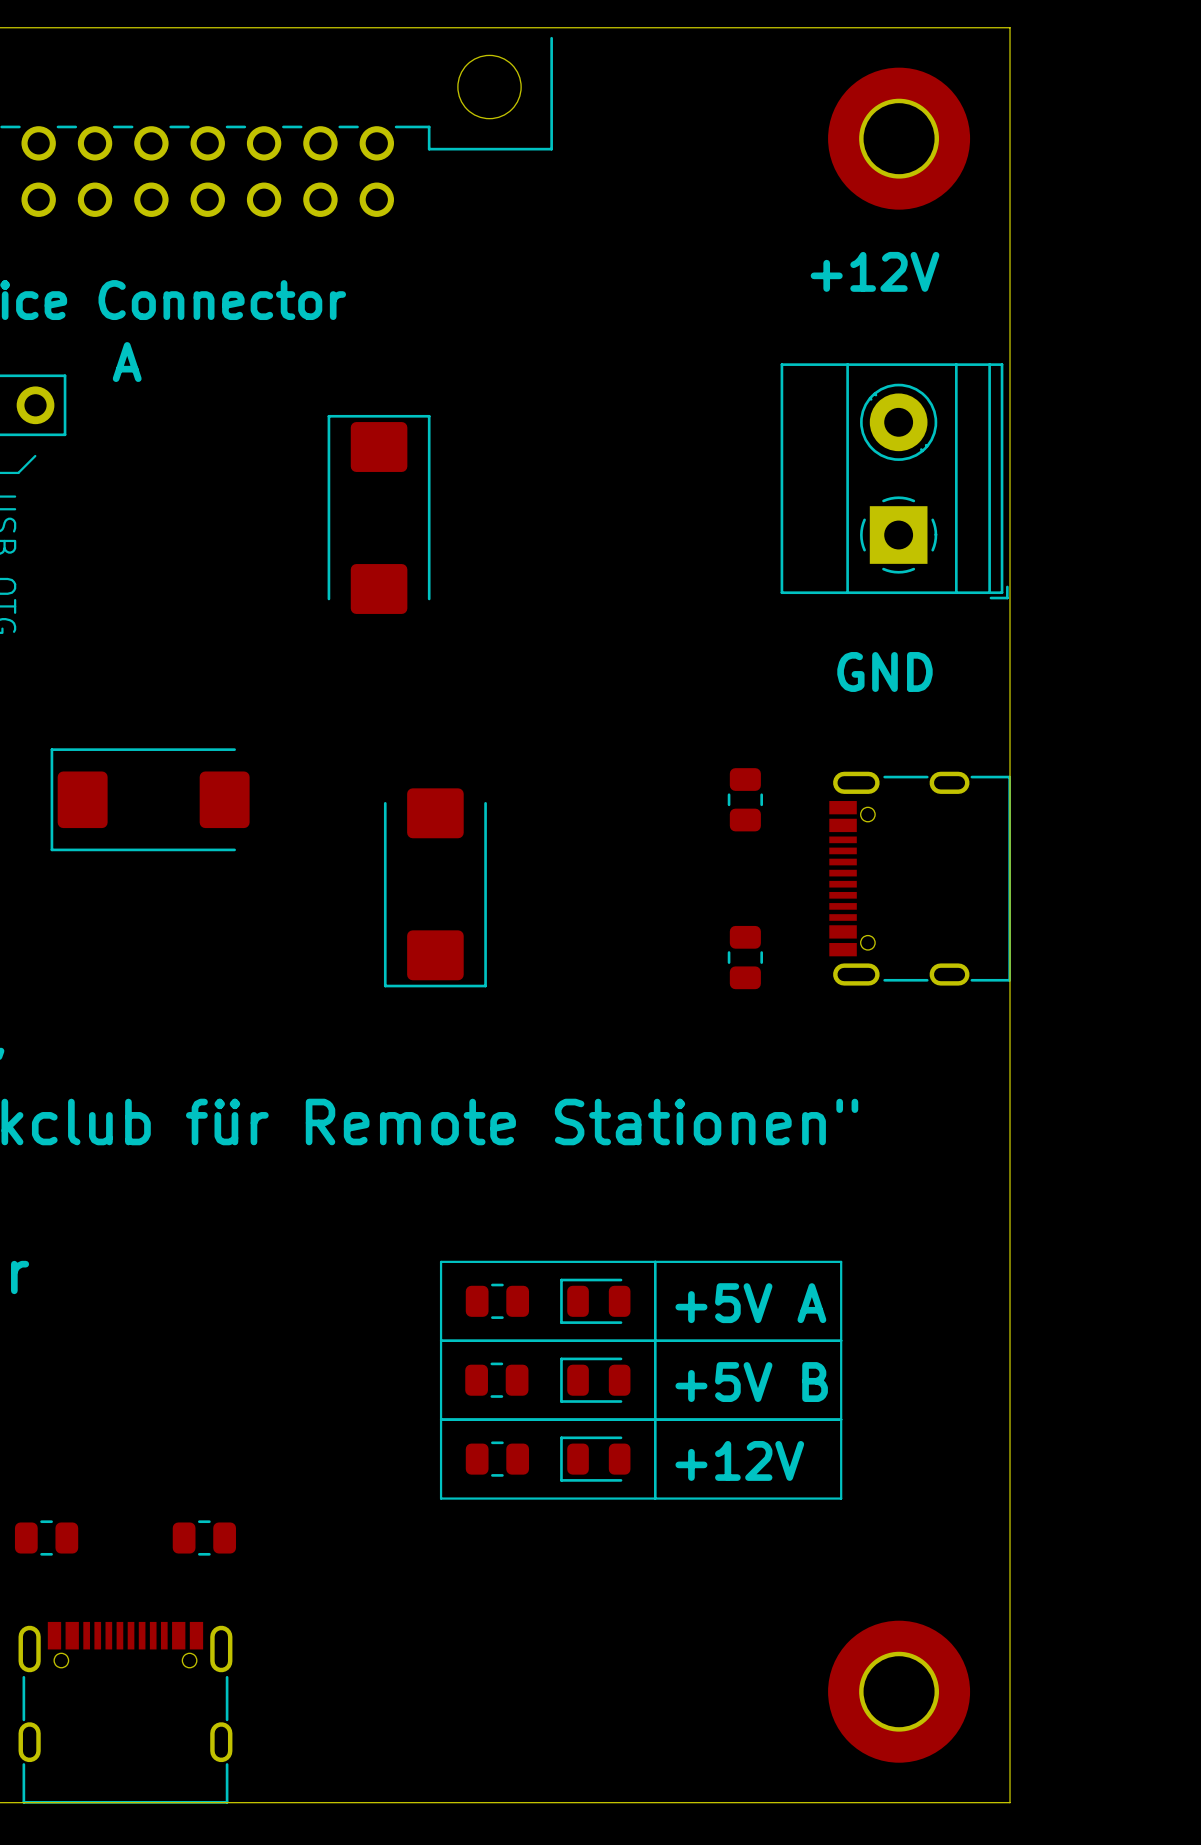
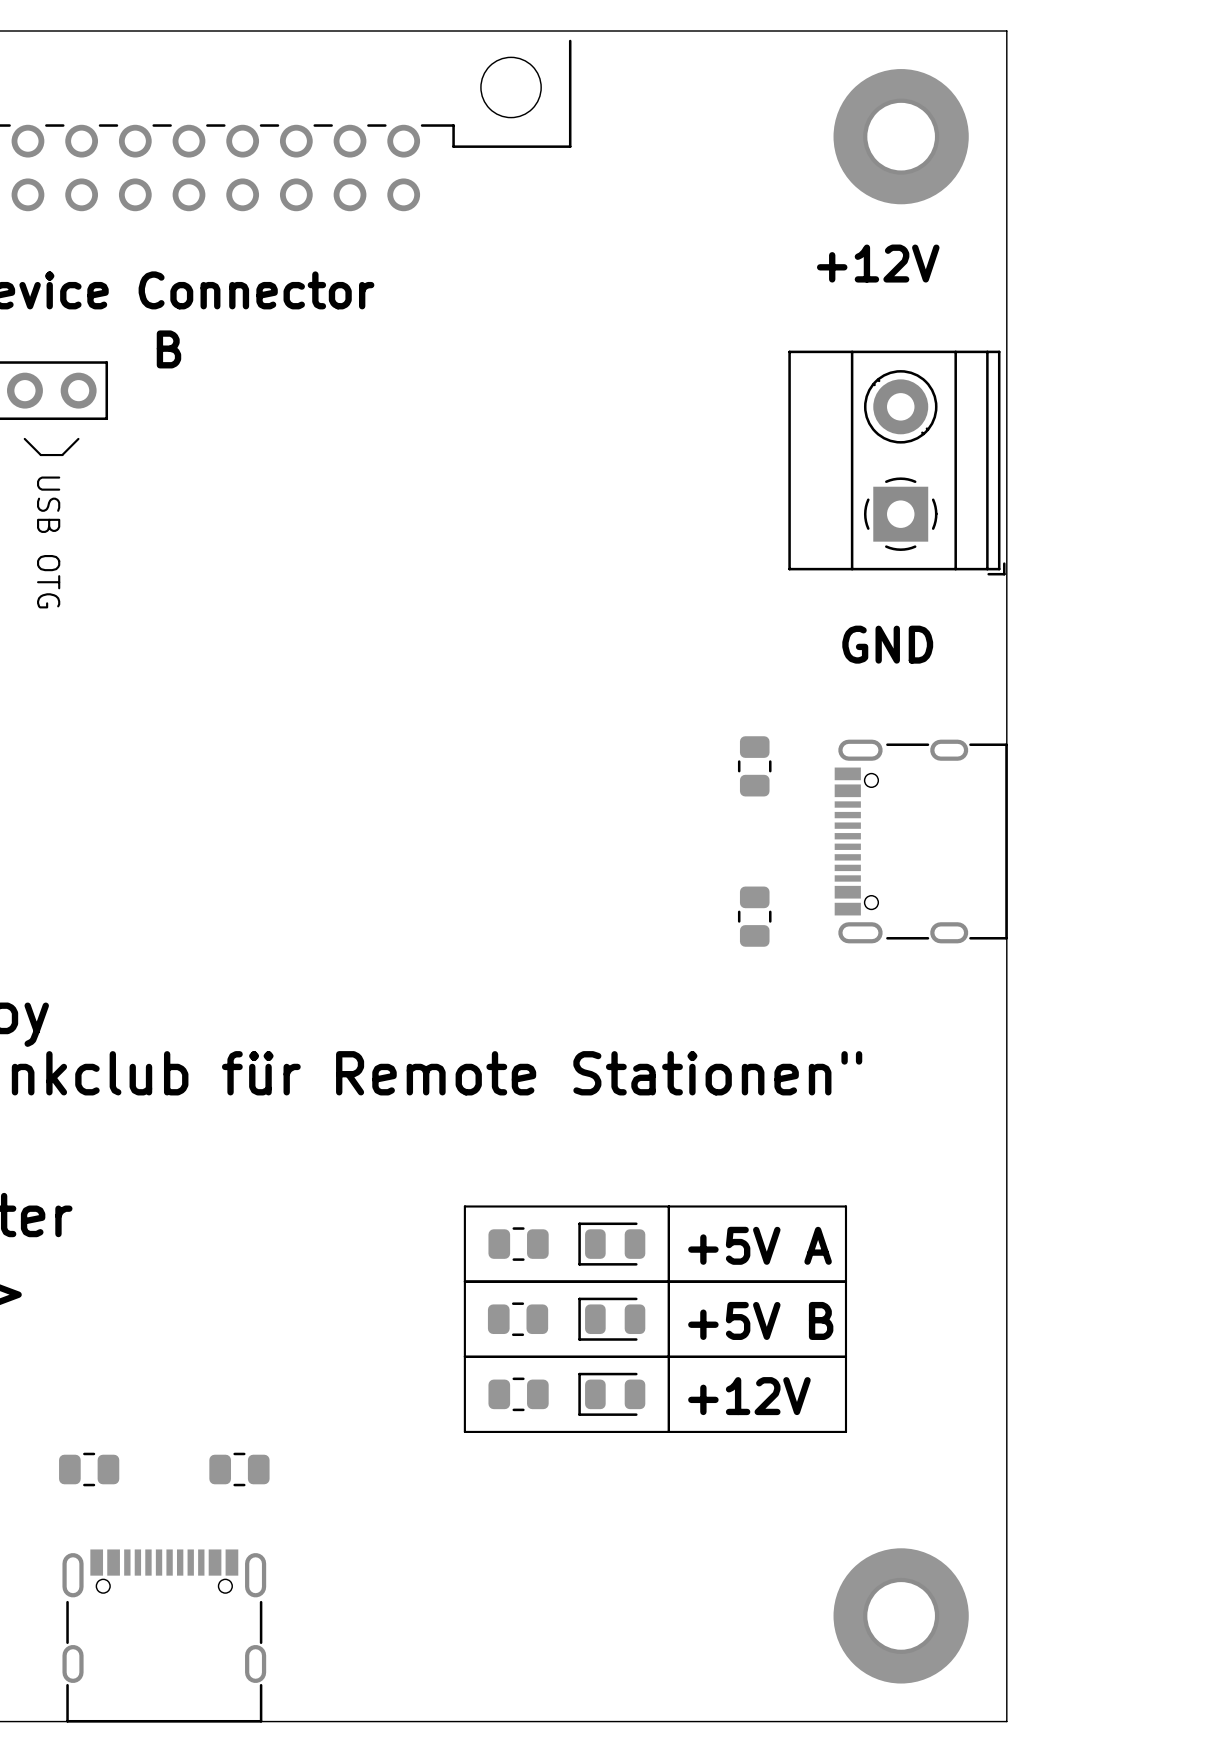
text: A (127, 362) -> B (168, 349)
part: (379, 514) -> none
part: (150, 799) -> none
part: (435, 887) -> none

